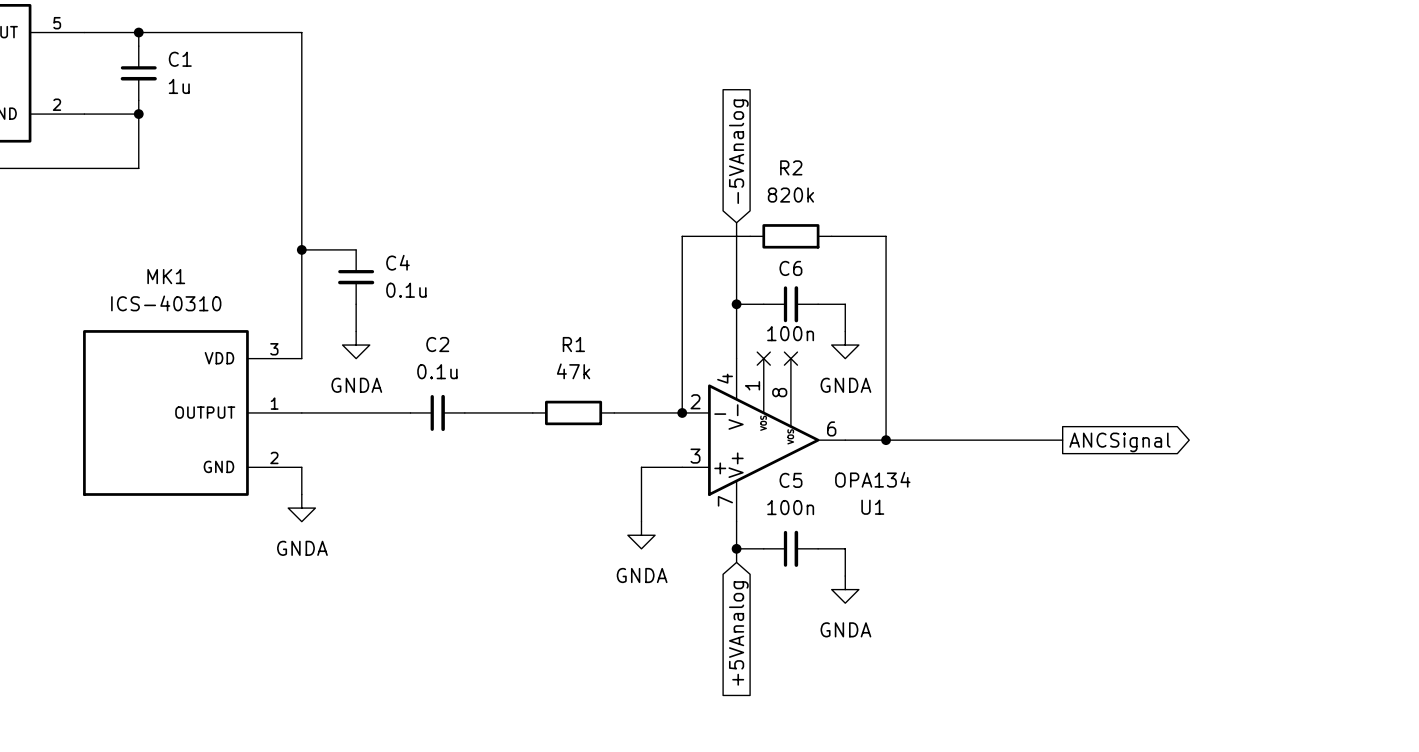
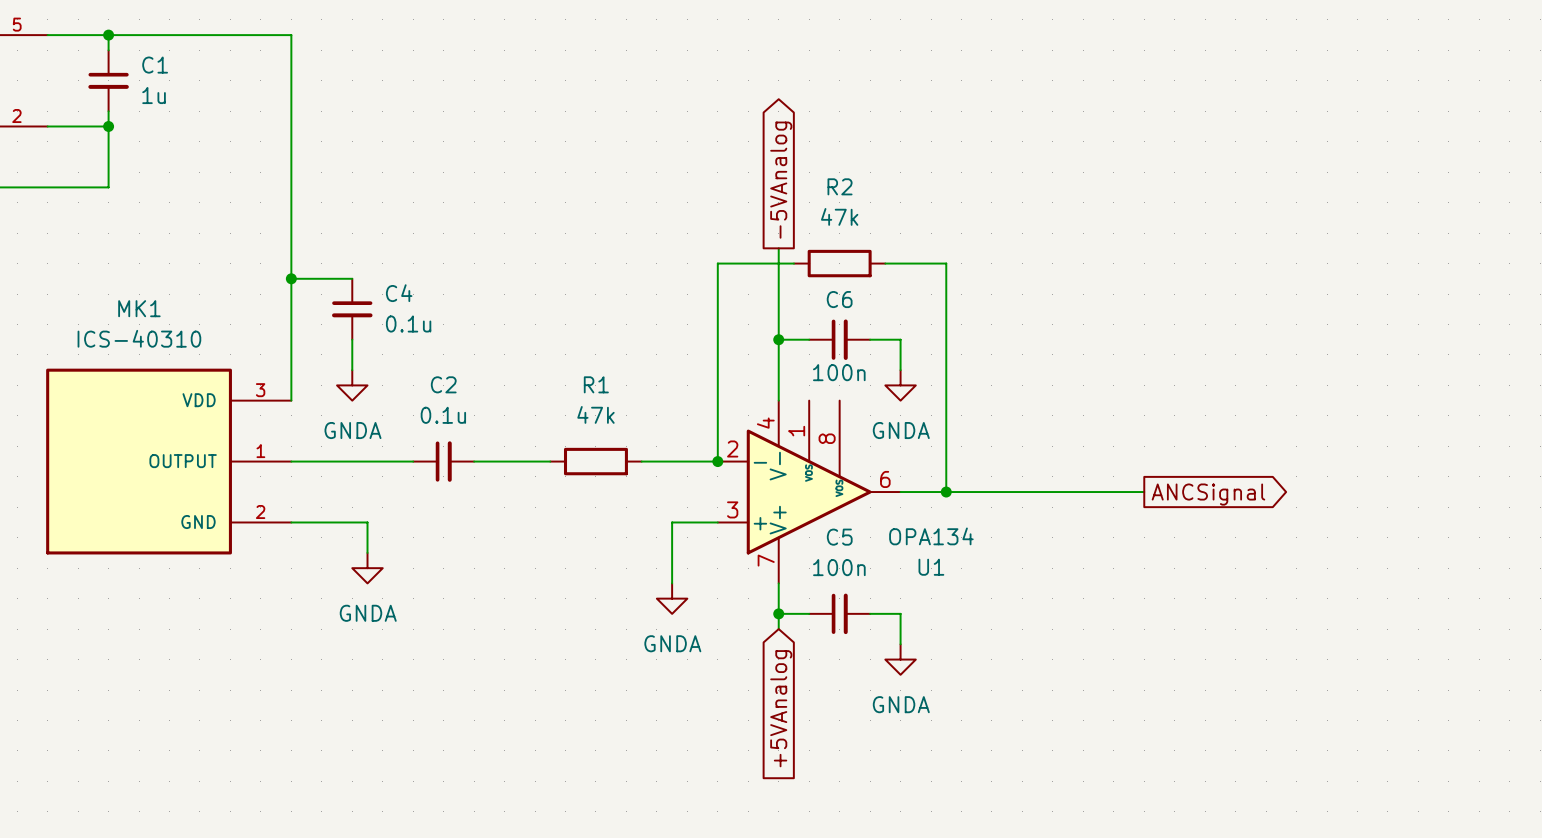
global label shape: input (738, 151) -> output (781, 180)
R2 value: 820k (790, 195) -> 47k (839, 216)
no-connect mark: (763, 358) -> none
no-connect mark: (790, 358) -> none
wire: (301, 467) (301, 494) -> (291, 522) (367, 522) (367, 552)
power symbol position: GNDA (301, 508) -> GNDA (367, 568)

